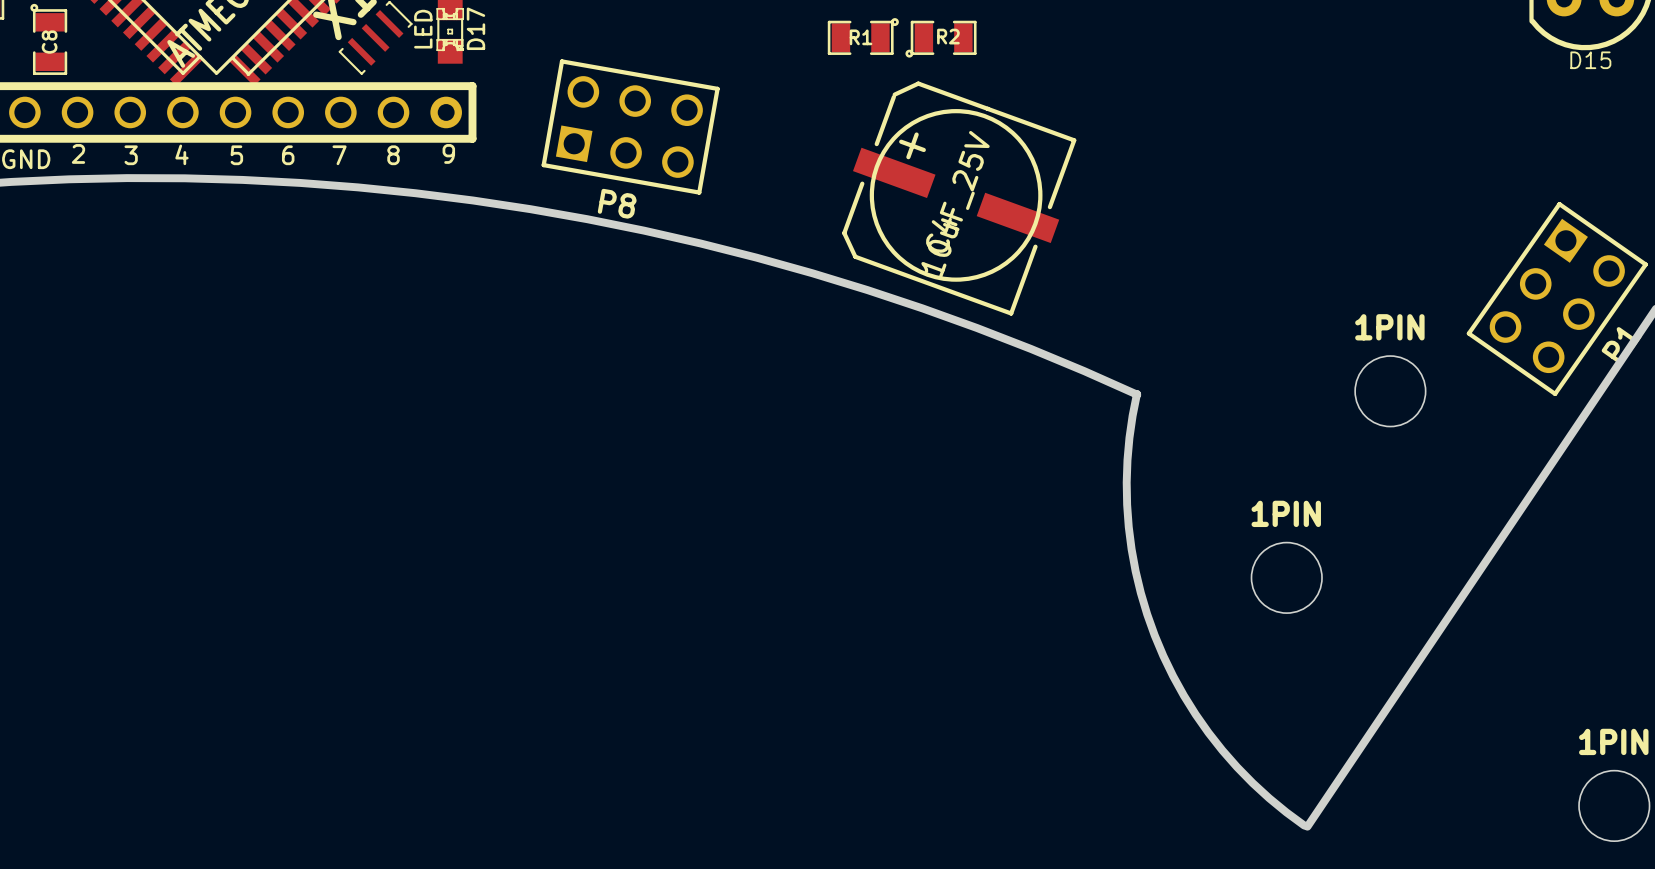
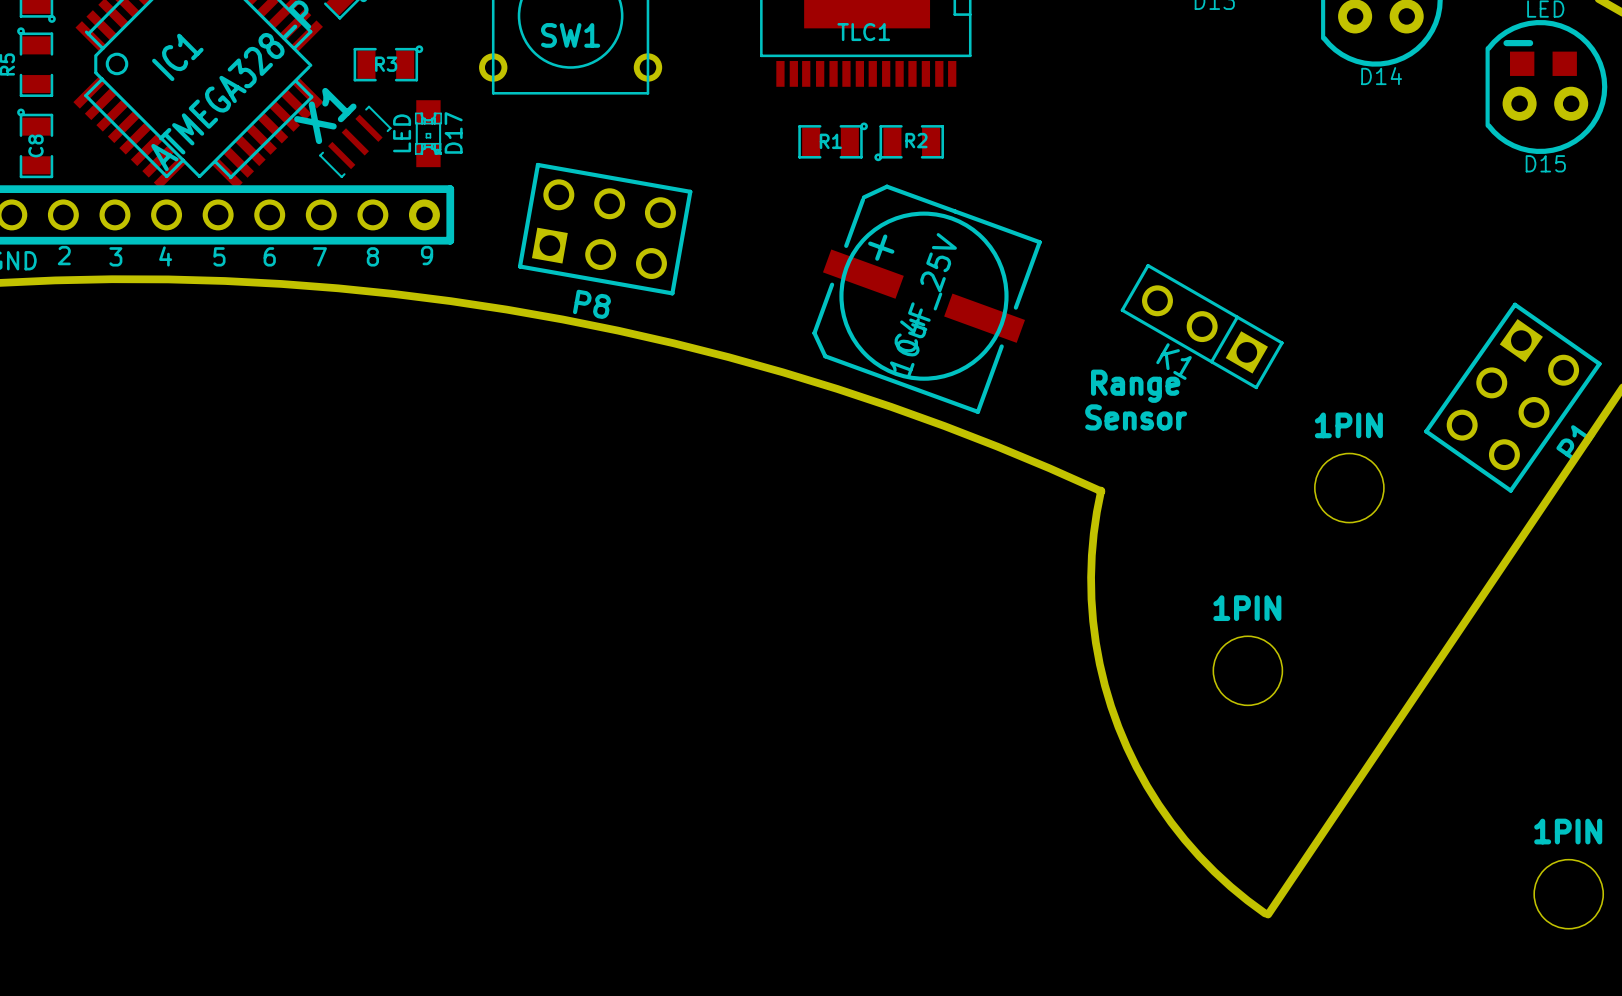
K1: none -> (1202, 326)
text: none -> Range (1135, 386)
text: none -> Sensor (1136, 417)

